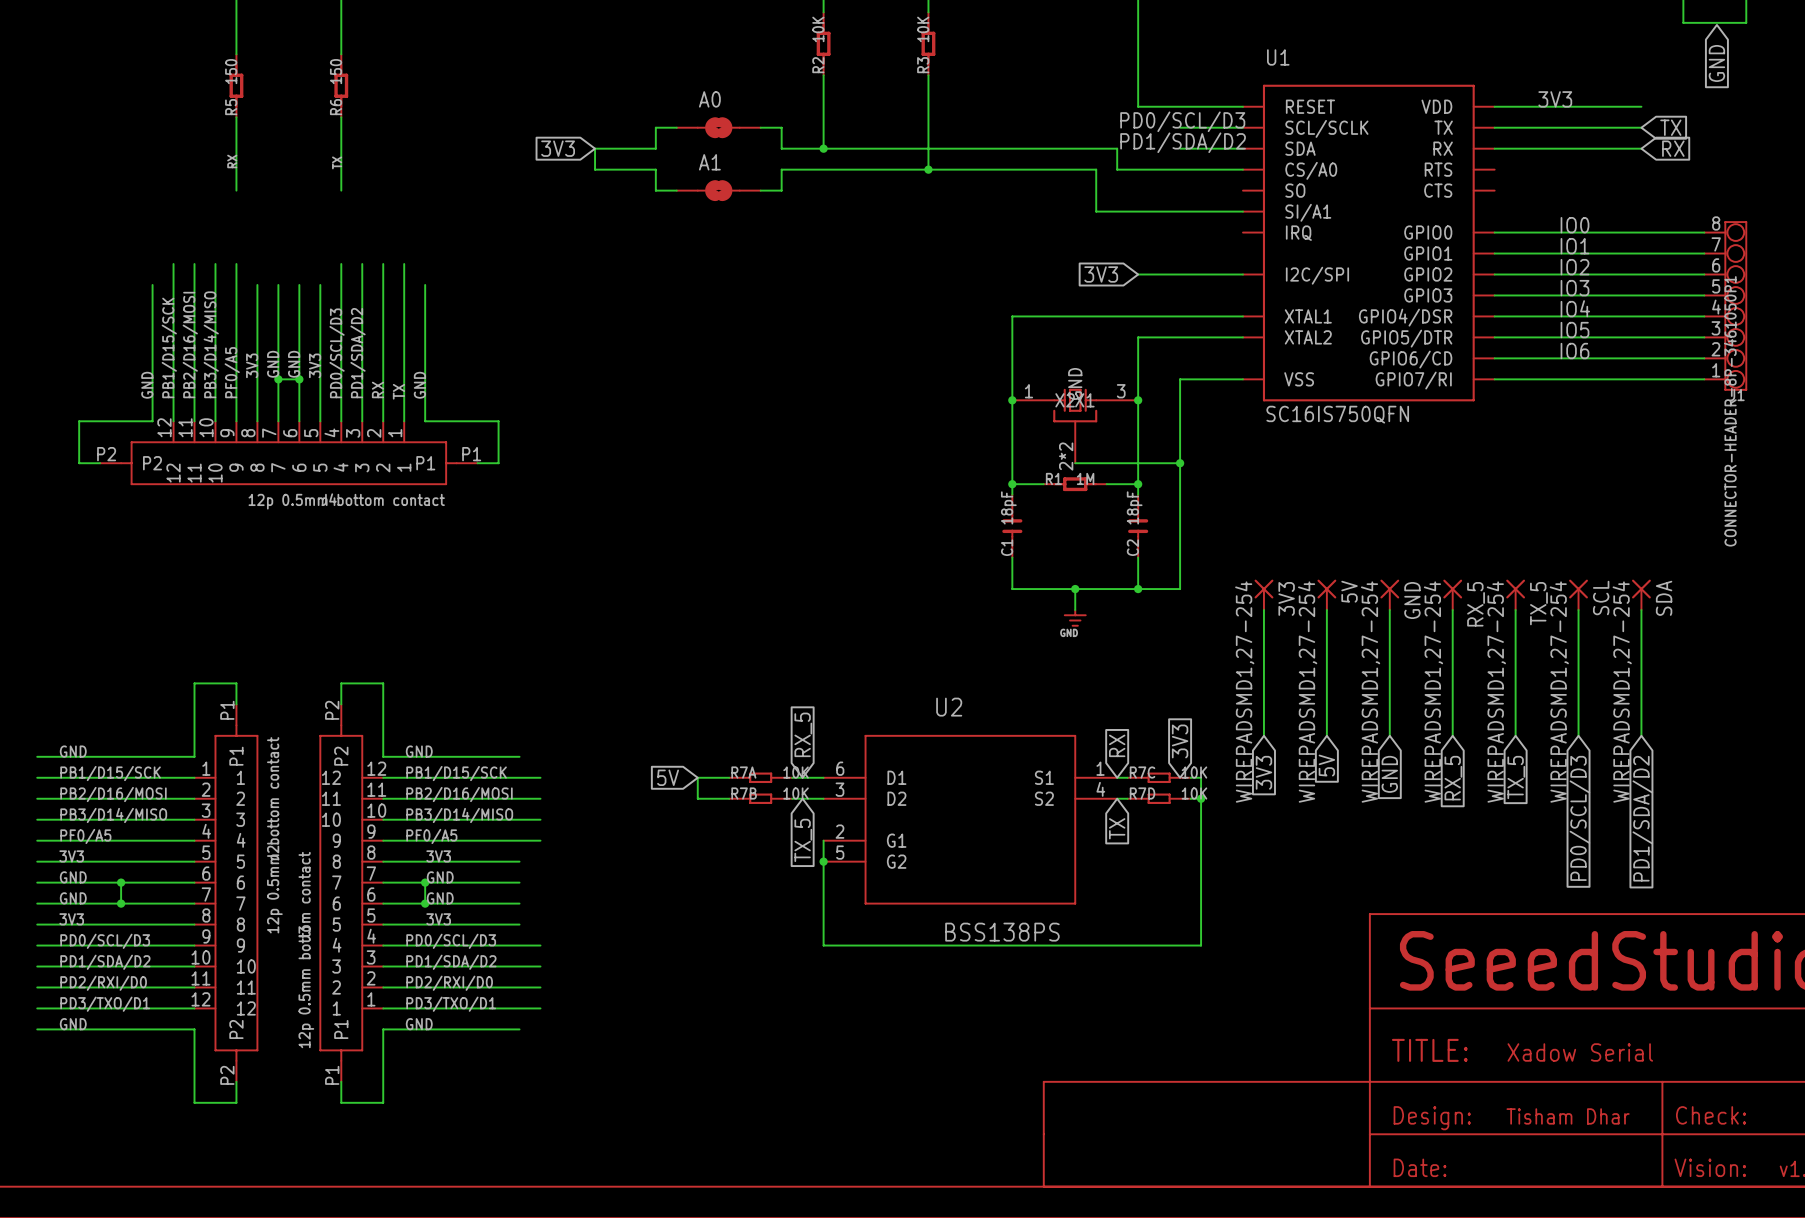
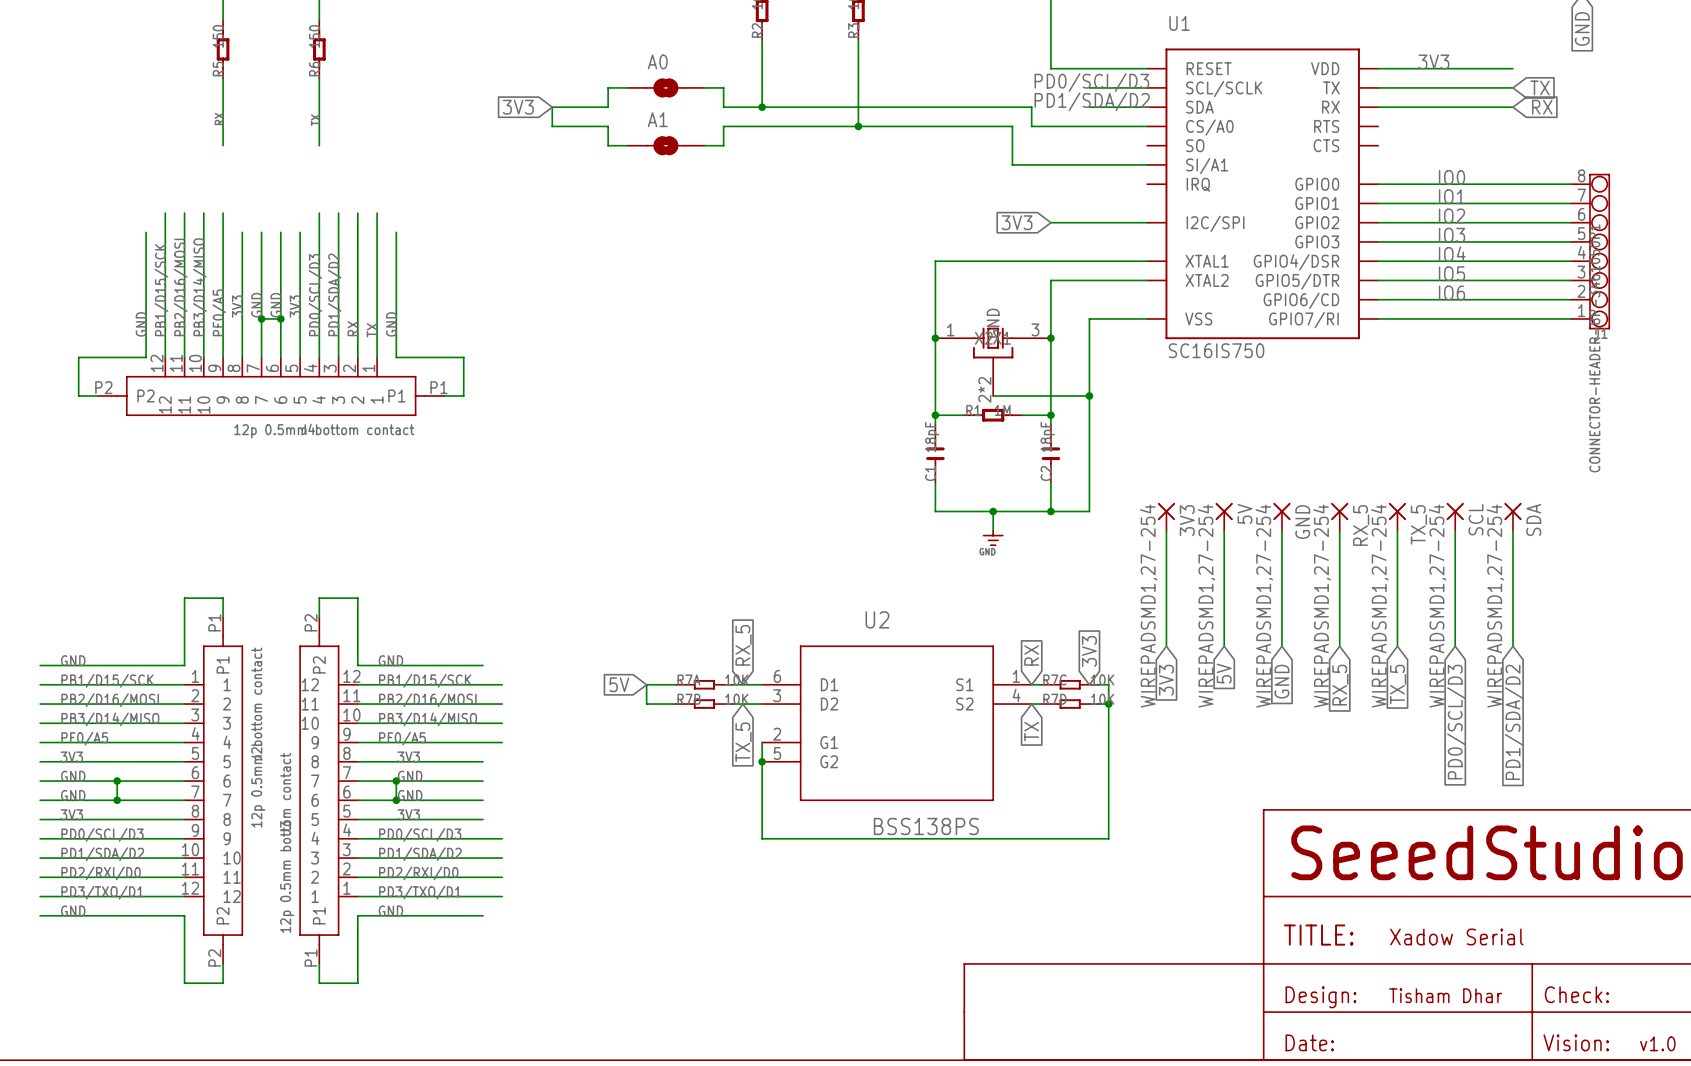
U1 value: SC16IS750QFN (1337, 414) -> SC16IS750 (1216, 350)

